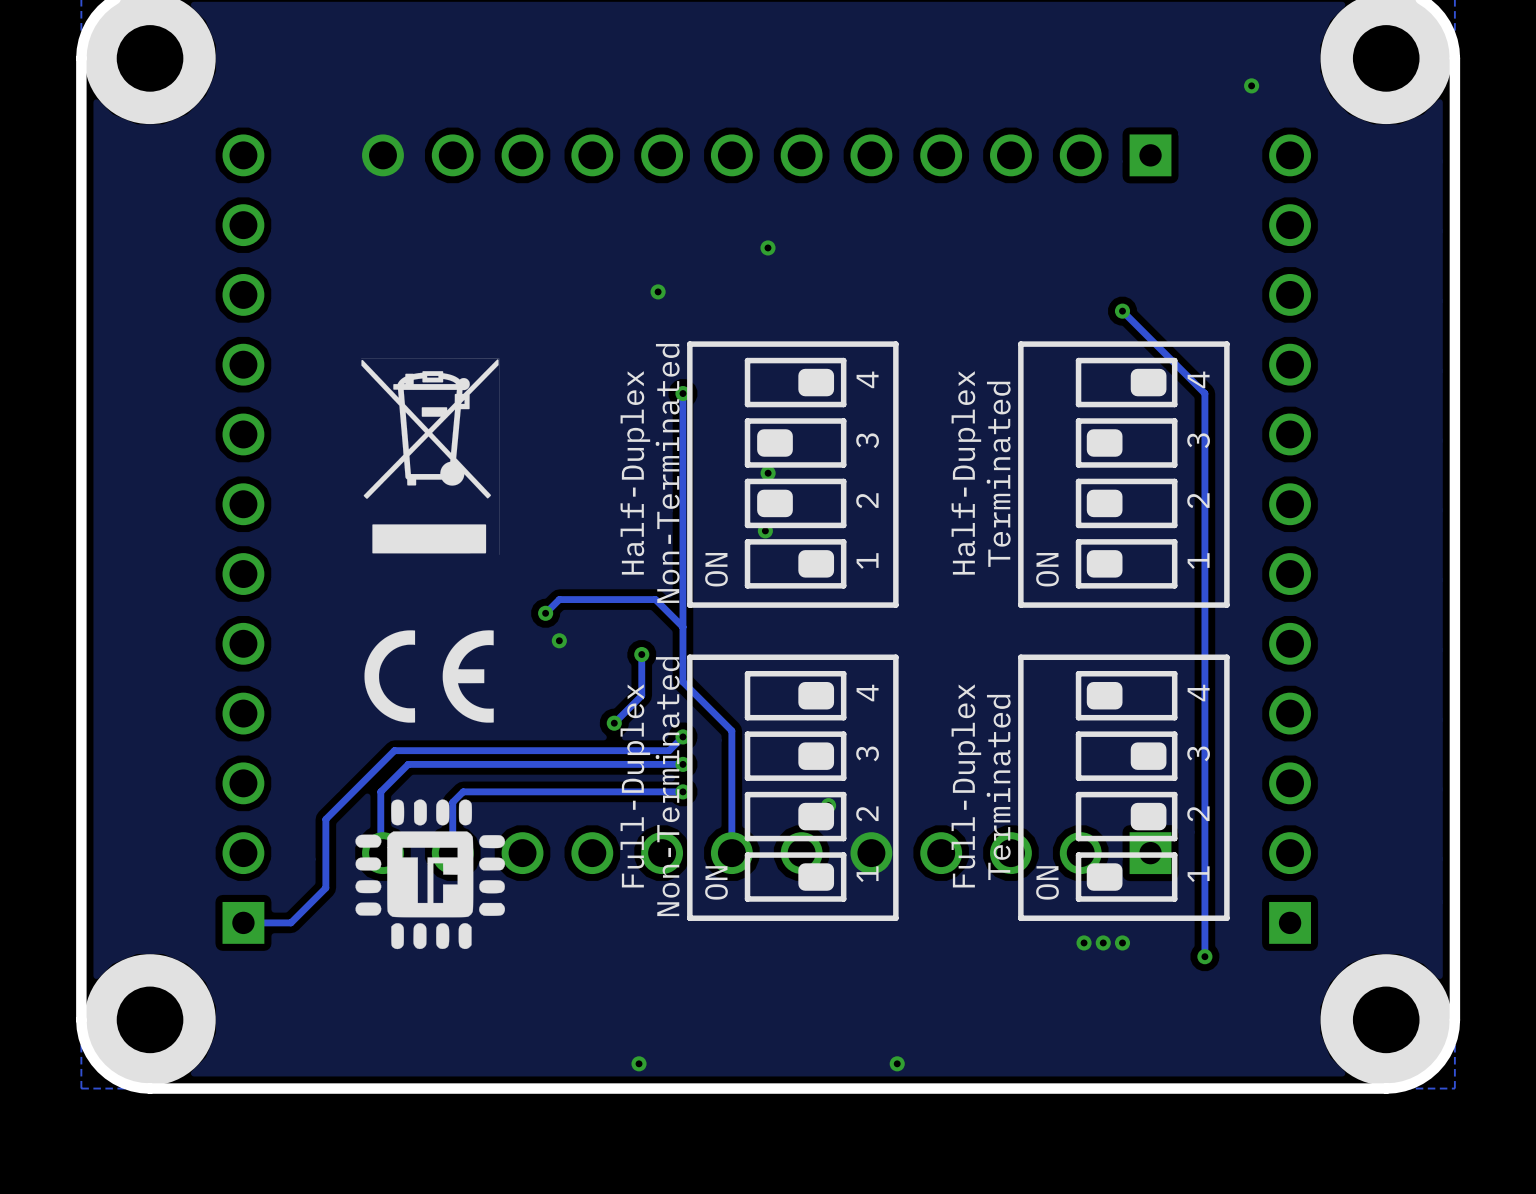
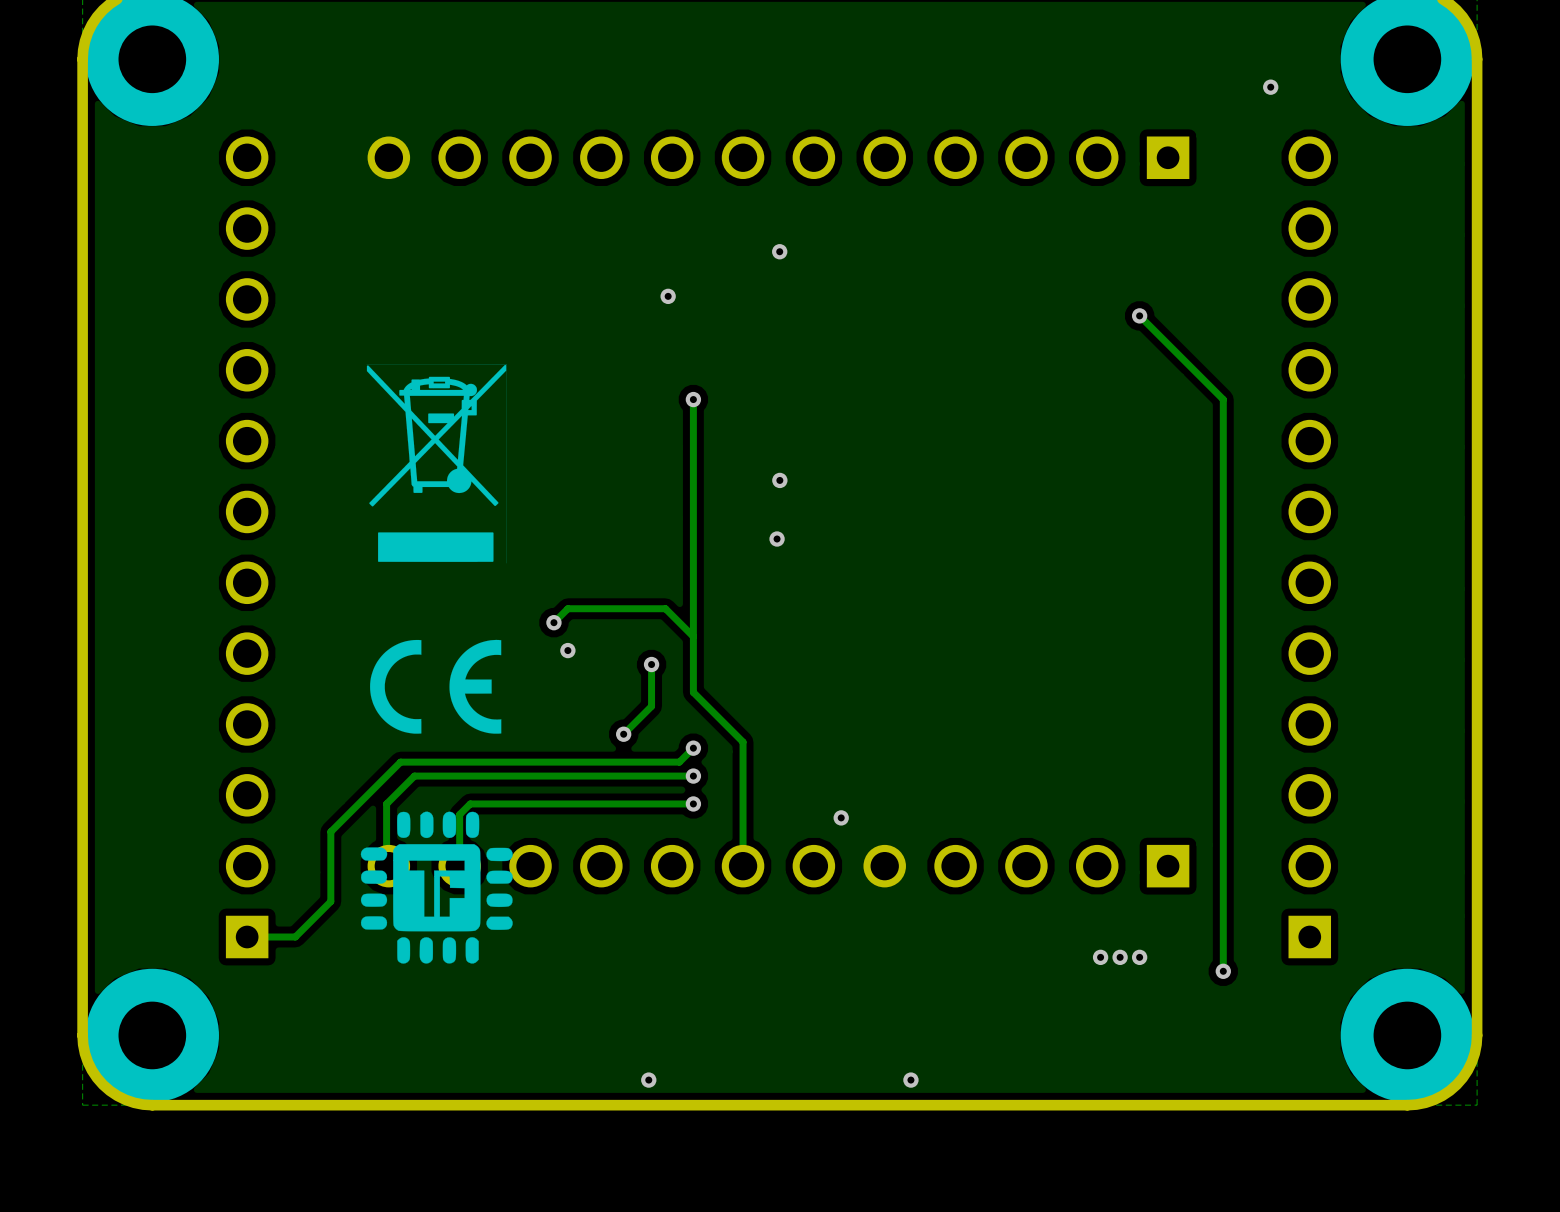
line: (895, 344) (895, 605) (689, 605) (689, 344) (895, 344) -> none
line: (1226, 344) (1226, 605) (1020, 605) (1020, 344) (1226, 344) -> none
line: (843, 360) (843, 404) (747, 404) (747, 360) (843, 360) -> none
line: (1174, 360) (1174, 404) (1078, 404) (1078, 360) (1174, 360) -> none
drawing: [798, 368, 835, 397] -> none
drawing: [1130, 368, 1167, 397] -> none
text: 4 (867, 379) -> none
text: 4 (1198, 379) -> none
line: (843, 421) (843, 464) (747, 464) (747, 421) (843, 421) -> none
line: (1174, 421) (1174, 464) (1078, 464) (1078, 421) (1174, 421) -> none
drawing: [757, 429, 793, 457] -> none
drawing: [1086, 429, 1123, 457] -> none
text: 3 (867, 440) -> none
text: 3 (1198, 440) -> none
text: Half-Duplex (635, 472) -> none
text: Half-Duplex (966, 472) -> none
text: Non-Terminated (667, 473) -> none
text: Terminated (998, 474) -> none
line: (843, 481) (843, 525) (747, 525) (747, 481) (843, 481) -> none
line: (1174, 481) (1174, 525) (1078, 525) (1078, 481) (1174, 481) -> none
drawing: [757, 489, 793, 518] -> none
drawing: [1086, 489, 1123, 518] -> none
text: 2 (867, 500) -> none
text: 2 (1198, 500) -> none
line: (843, 541) (843, 585) (747, 585) (747, 541) (843, 541) -> none
line: (1174, 541) (1174, 585) (1078, 585) (1078, 541) (1174, 541) -> none
drawing: [798, 550, 835, 578] -> none
drawing: [1086, 550, 1123, 578] -> none
text: 1 (867, 561) -> none
text: 1 (1198, 561) -> none
text: ON (716, 569) -> none
text: ON (1047, 569) -> none
line: (895, 657) (689, 657) (689, 918) (895, 918) (895, 657) -> none
line: (1226, 657) (1226, 918) (1020, 918) (1020, 657) (1226, 657) -> none
line: (843, 673) (747, 673) (747, 717) (843, 717) (843, 673) -> none
line: (1174, 673) (1174, 717) (1078, 717) (1078, 673) (1174, 673) -> none
drawing: [798, 681, 835, 710] -> none
drawing: [1086, 681, 1123, 710] -> none
text: 4 (867, 693) -> none
text: 4 (1198, 693) -> none
line: (843, 734) (747, 734) (747, 778) (843, 778) (843, 734) -> none
line: (1174, 734) (1174, 778) (1078, 778) (1078, 734) (1174, 734) -> none
drawing: [798, 742, 835, 770] -> none
drawing: [1130, 742, 1167, 770] -> none
text: 3 (867, 753) -> none
text: 3 (1198, 753) -> none
text: Full-Duplex (635, 785) -> none
text: Full-Duplex (966, 785) -> none
text: Non-Terminated (667, 786) -> none
text: Terminated (998, 787) -> none
line: (843, 794) (747, 794) (747, 838) (843, 838) (843, 794) -> none
line: (1174, 794) (1174, 838) (1078, 838) (1078, 794) (1174, 794) -> none
drawing: [798, 802, 835, 831] -> none
drawing: [1130, 802, 1167, 831] -> none
text: 2 (867, 813) -> none
text: 2 (1198, 813) -> none
line: (843, 855) (747, 855) (747, 899) (843, 899) (843, 855) -> none
line: (1174, 855) (1174, 899) (1078, 899) (1078, 855) (1174, 855) -> none
drawing: [798, 863, 835, 891] -> none
drawing: [1086, 863, 1123, 891] -> none
text: 1 (867, 874) -> none
text: 1 (1198, 874) -> none
text: ON (716, 882) -> none
text: ON (1047, 882) -> none

